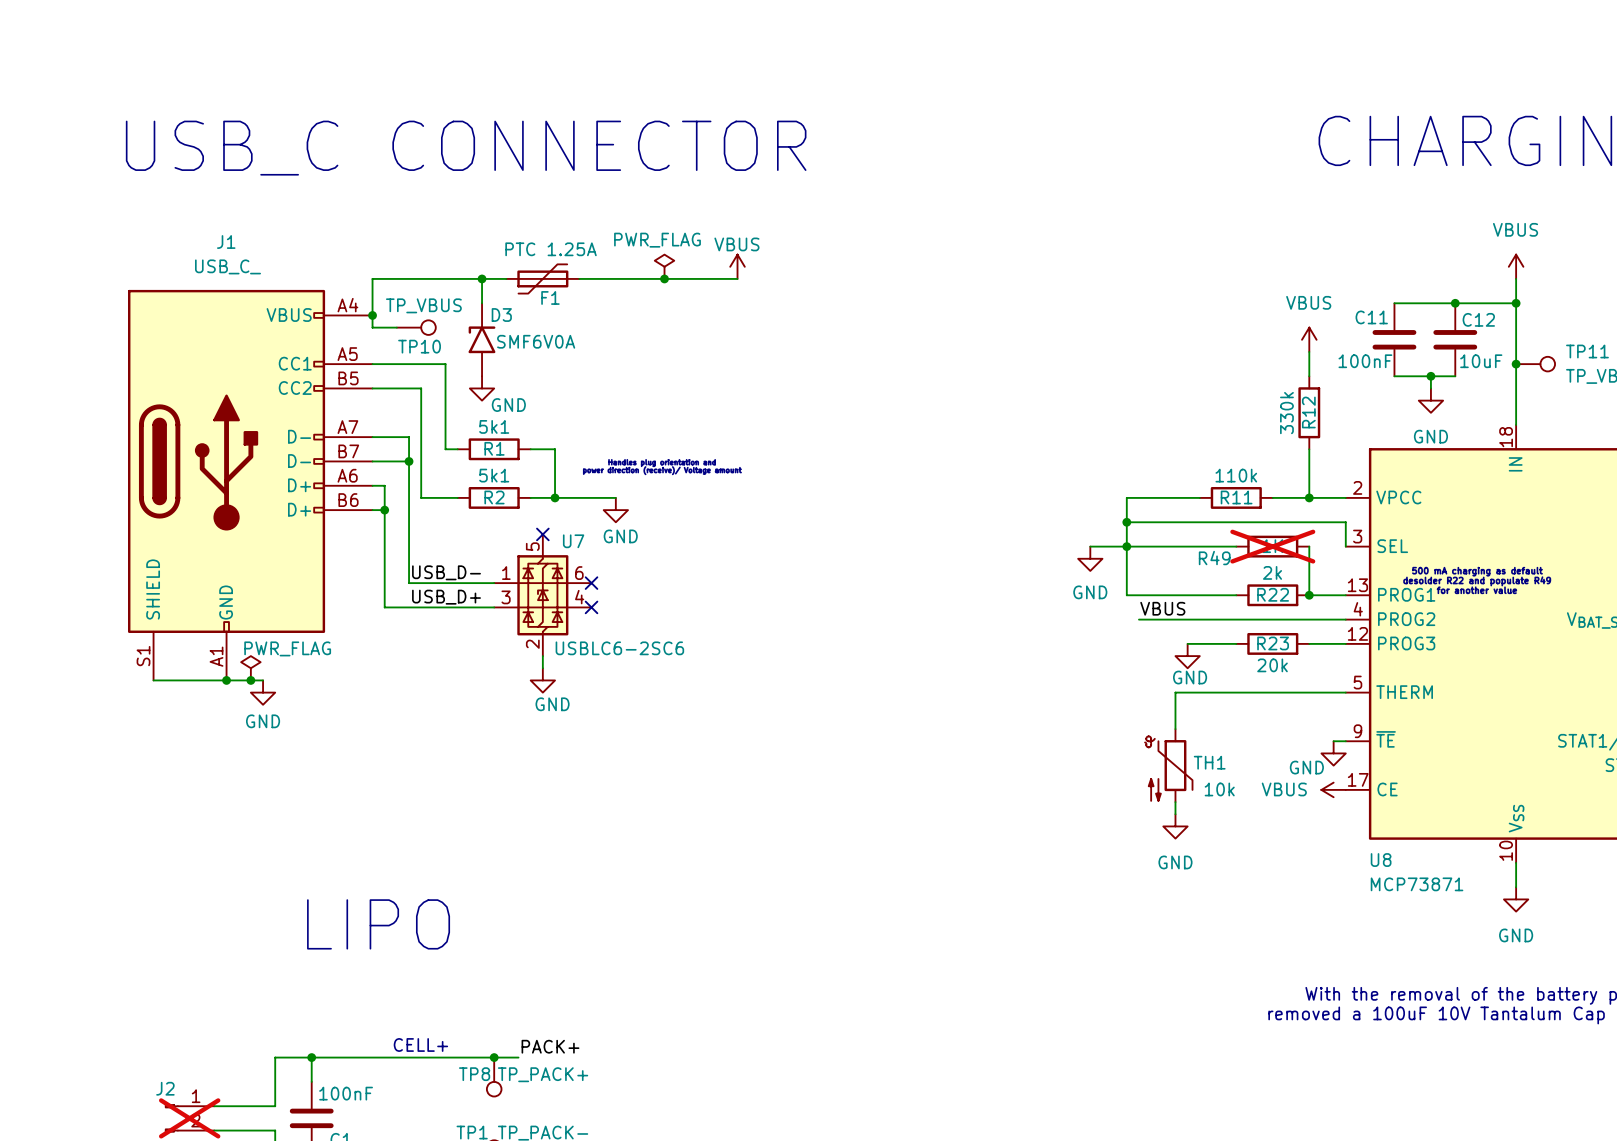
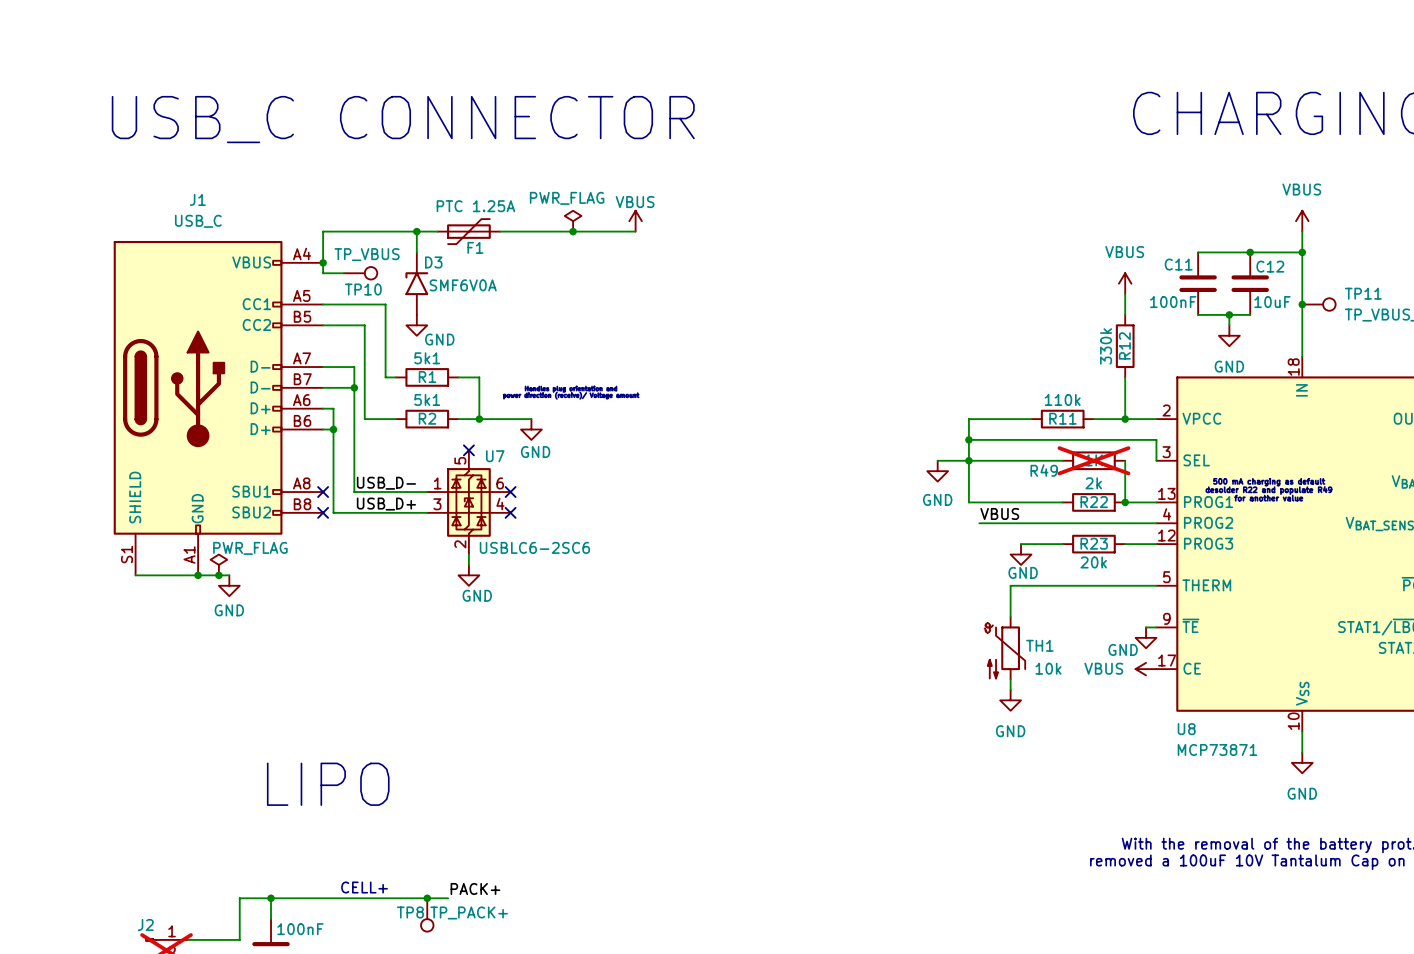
J1 value: USB_C_ (227, 266) -> USB_C (198, 221)
J1 symbol: [128, 289, 373, 681] -> [113, 240, 324, 576]
no-connect mark: none -> (323, 492)
no-connect mark: none -> (323, 512)

